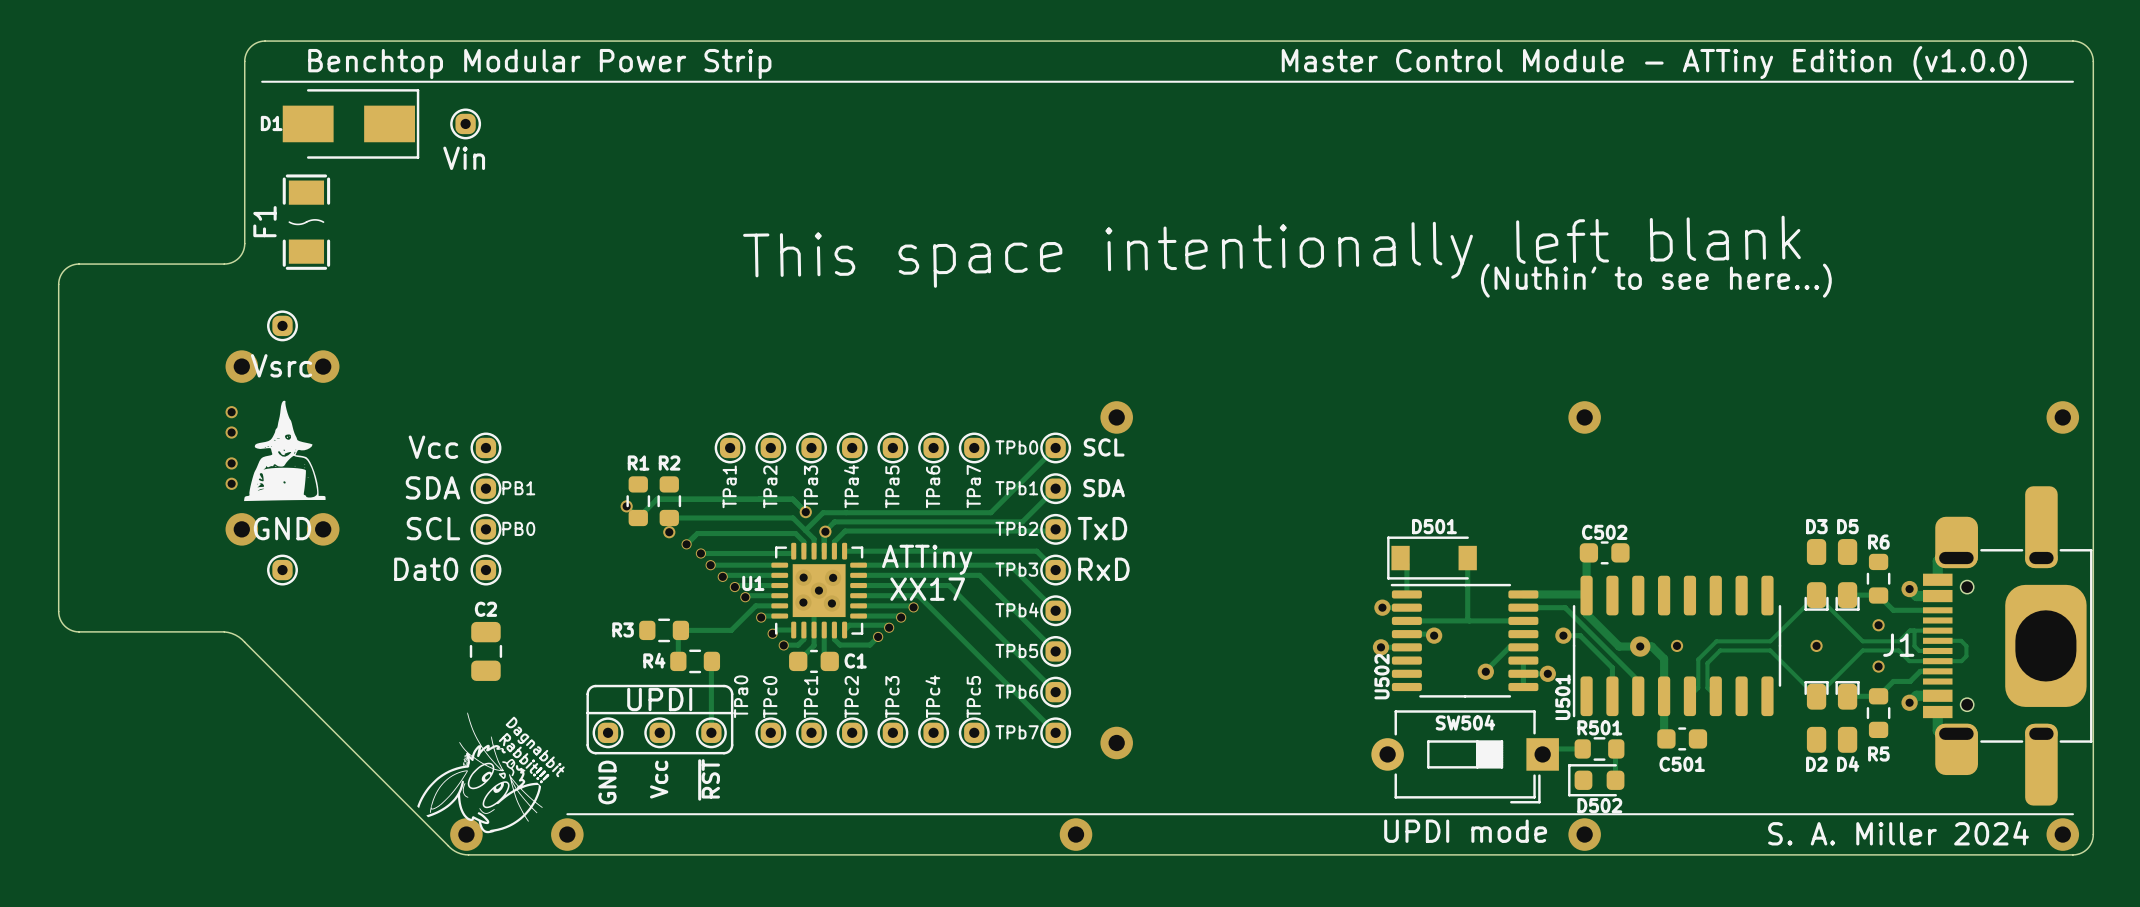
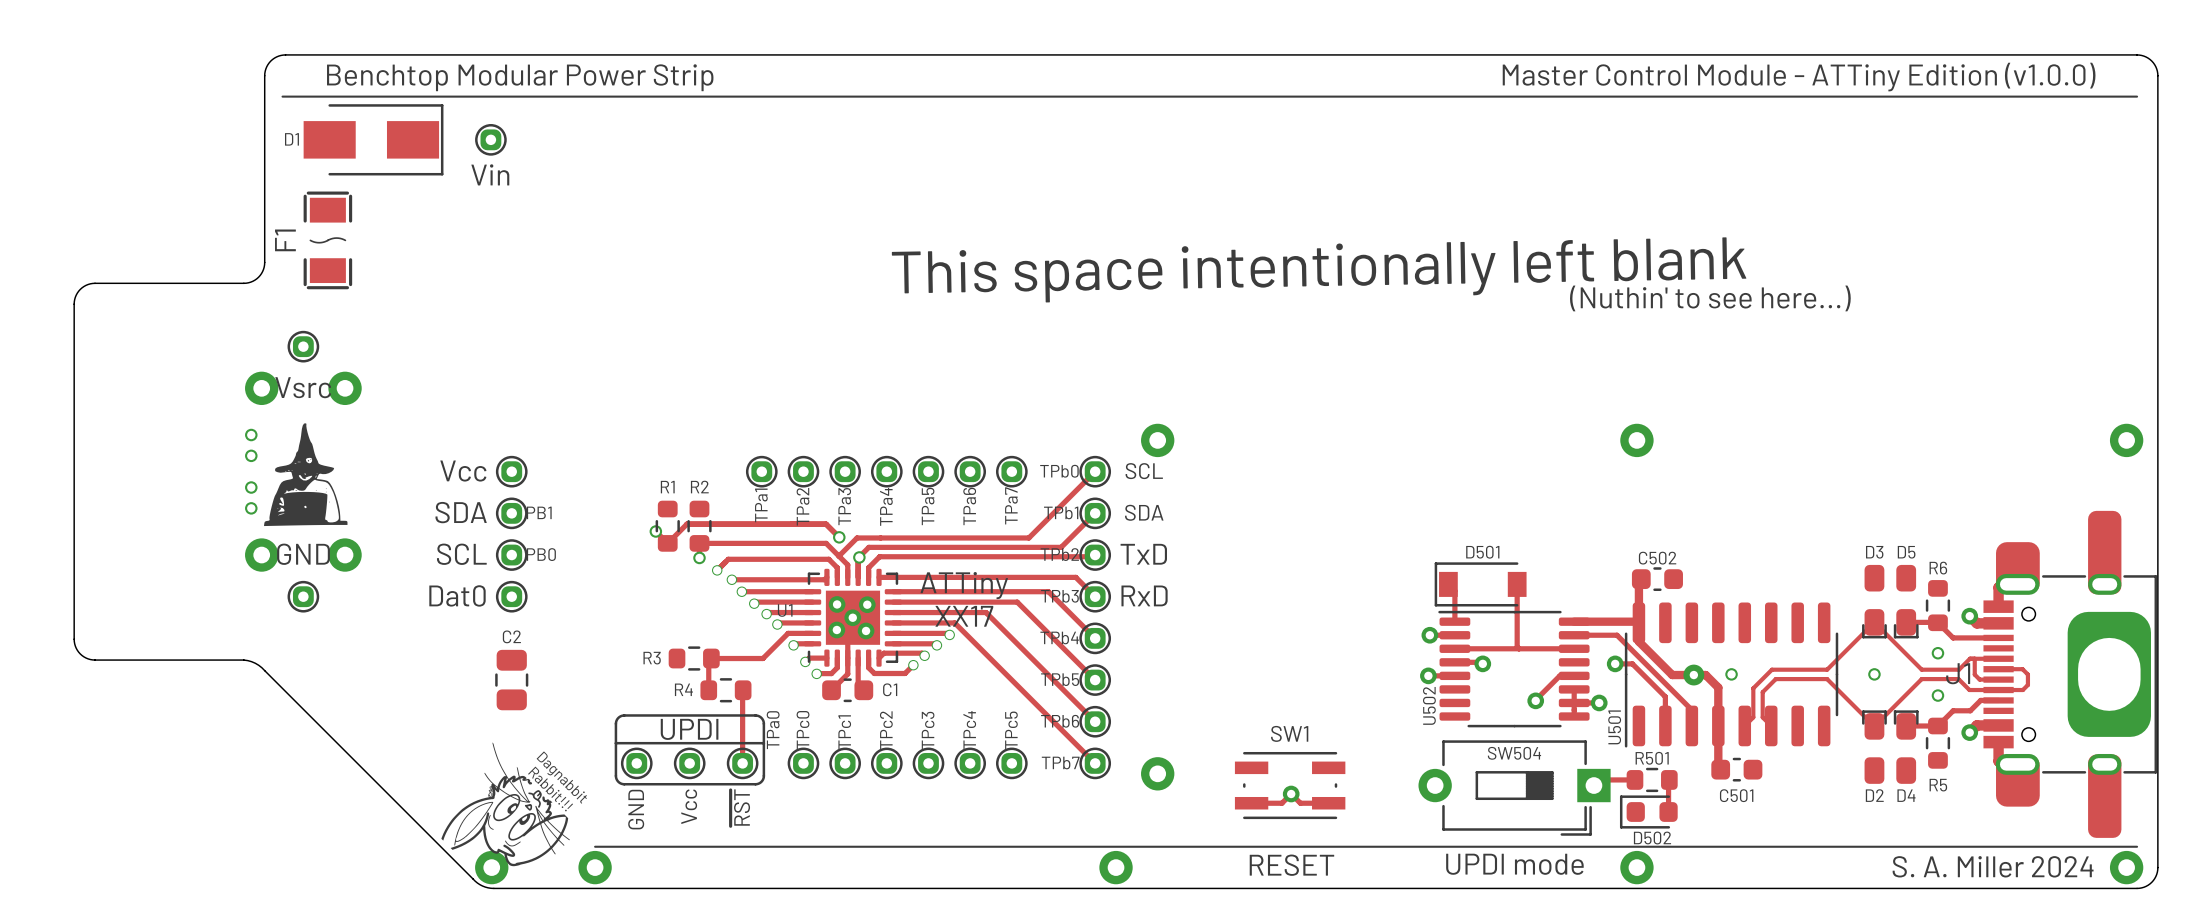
SW1: none -> (1290, 785)
via: none -> (1291, 794)
track: none -> (1251, 803) (1281, 803) (1291, 794) (1300, 803) (1328, 803)
text: none -> RESET (1291, 865)

